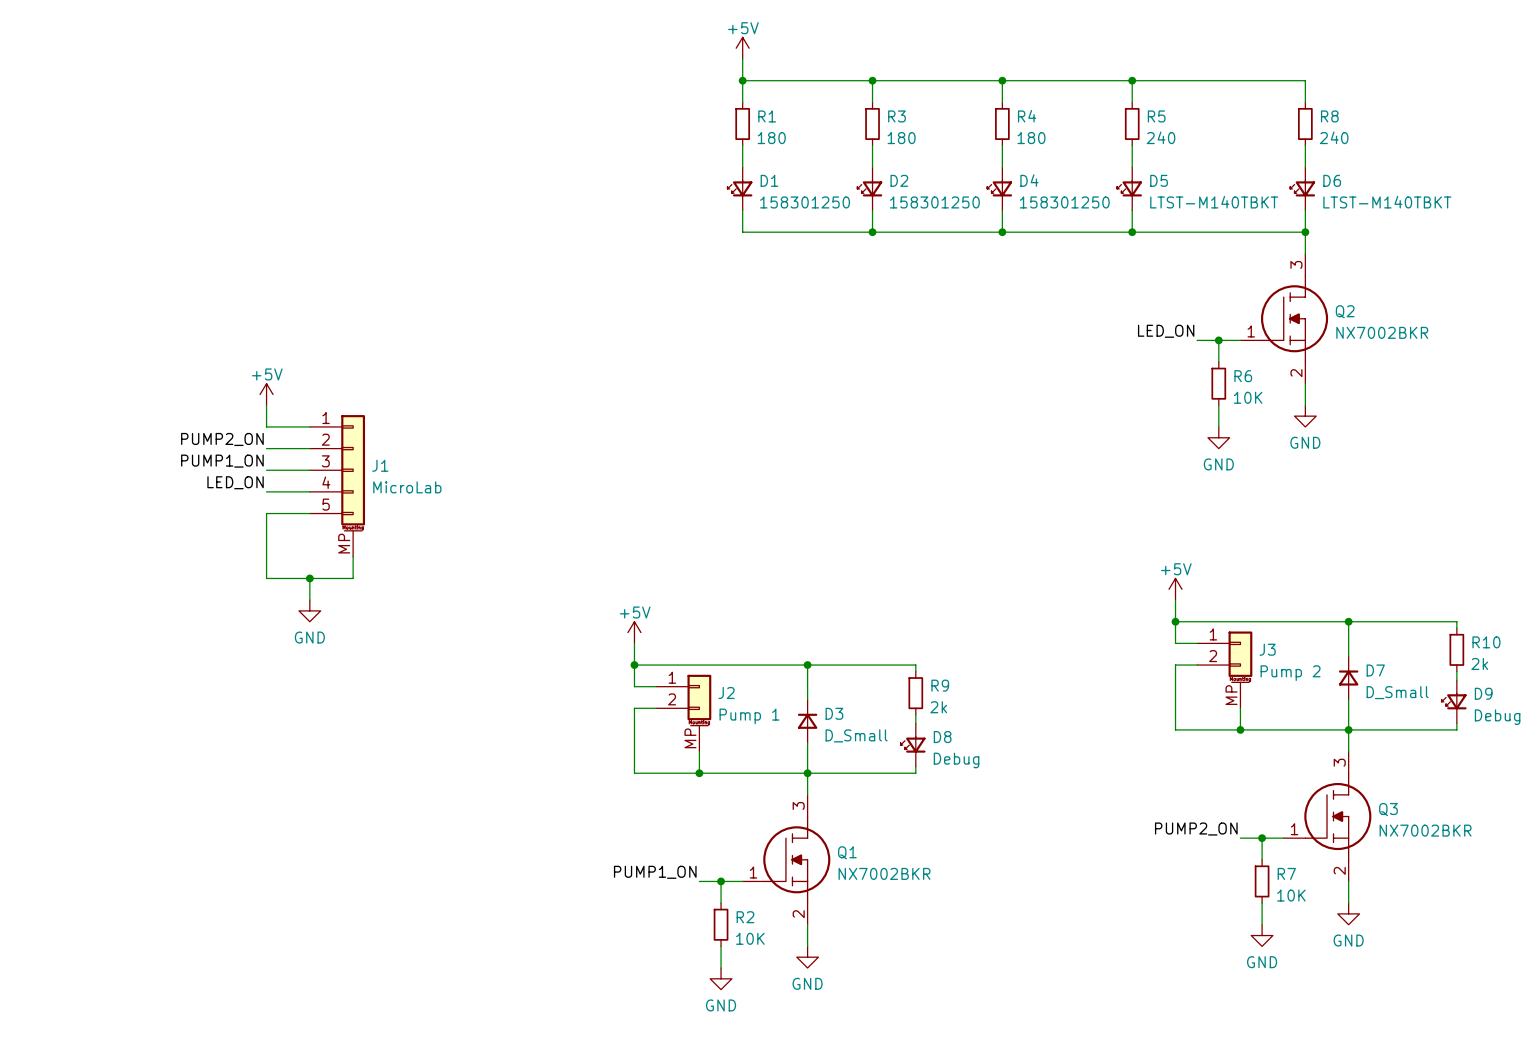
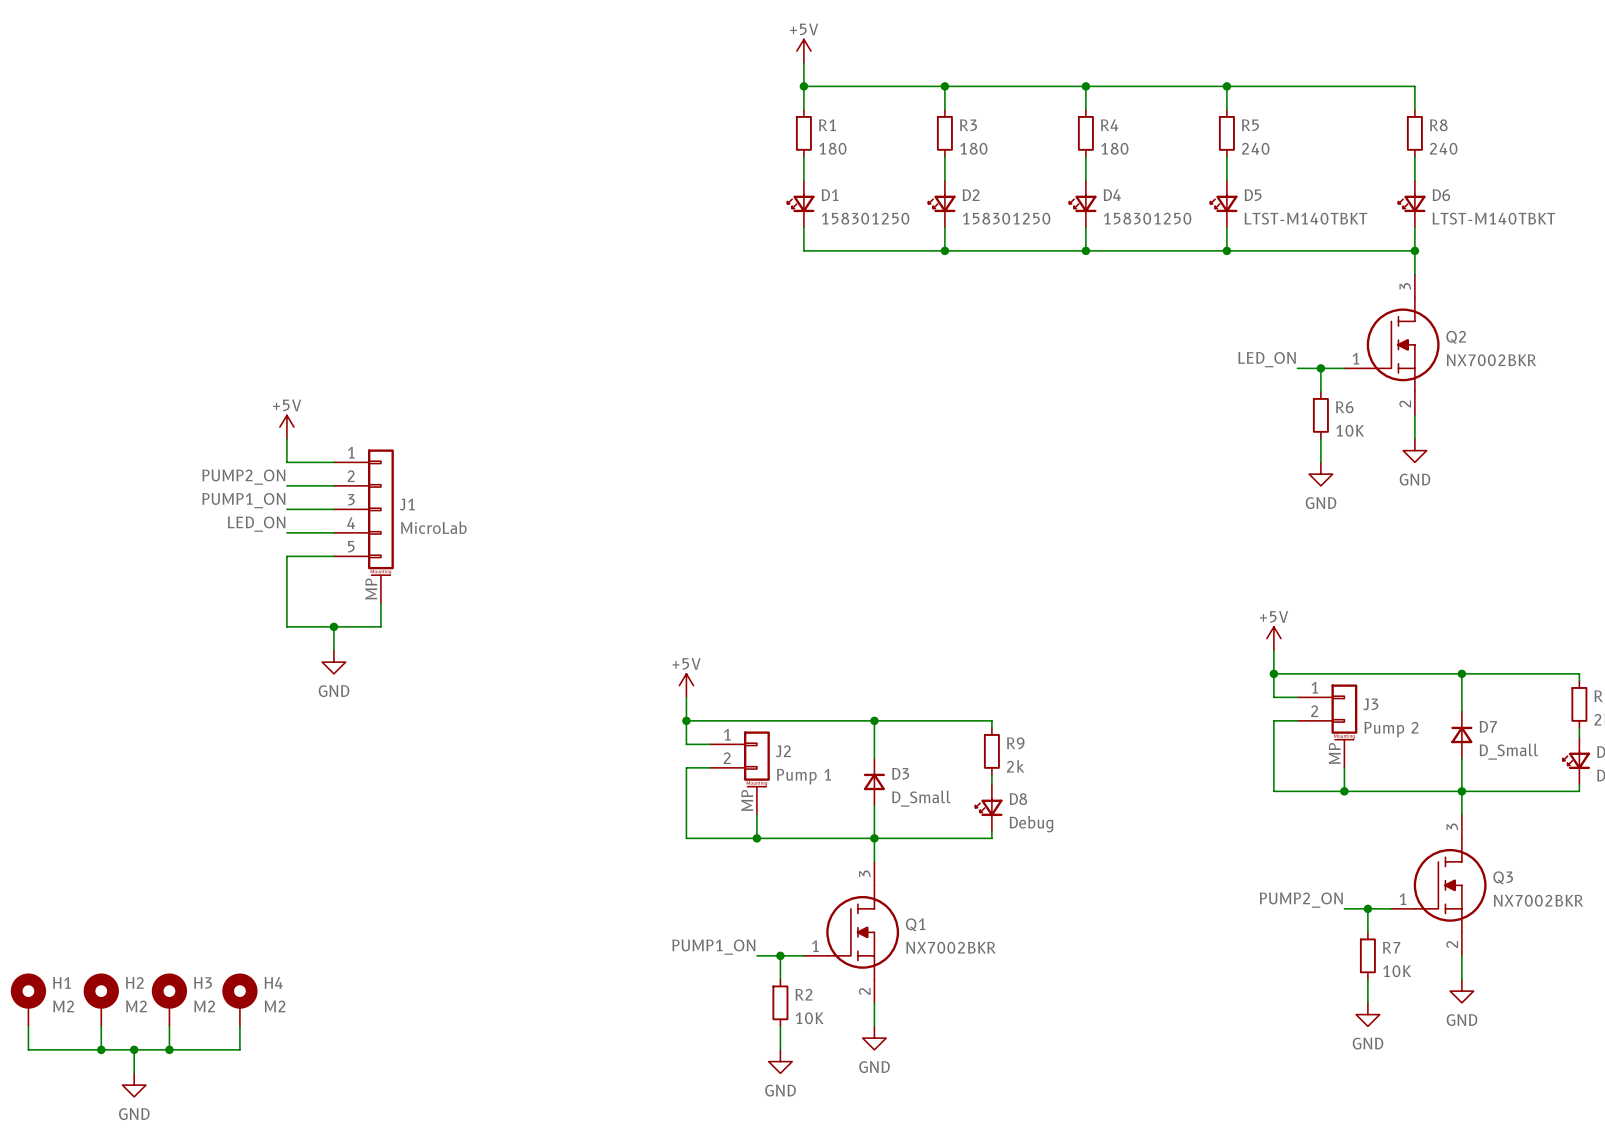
H1: none -> M2 (28, 999)
H2: none -> M2 (101, 999)
H3: none -> M2 (169, 999)
H4: none -> M2 (239, 999)
wire: none -> (28, 1026) (28, 1049) (239, 1049) (239, 1026)
wire: none -> (101, 1026) (101, 1049)
wire: none -> (169, 1026) (169, 1049)
junction: none -> (101, 1049)
wire: none -> (134, 1049) (134, 1073)
junction: none -> (134, 1049)
junction: none -> (169, 1049)
power symbol: none -> GND (134, 1085)

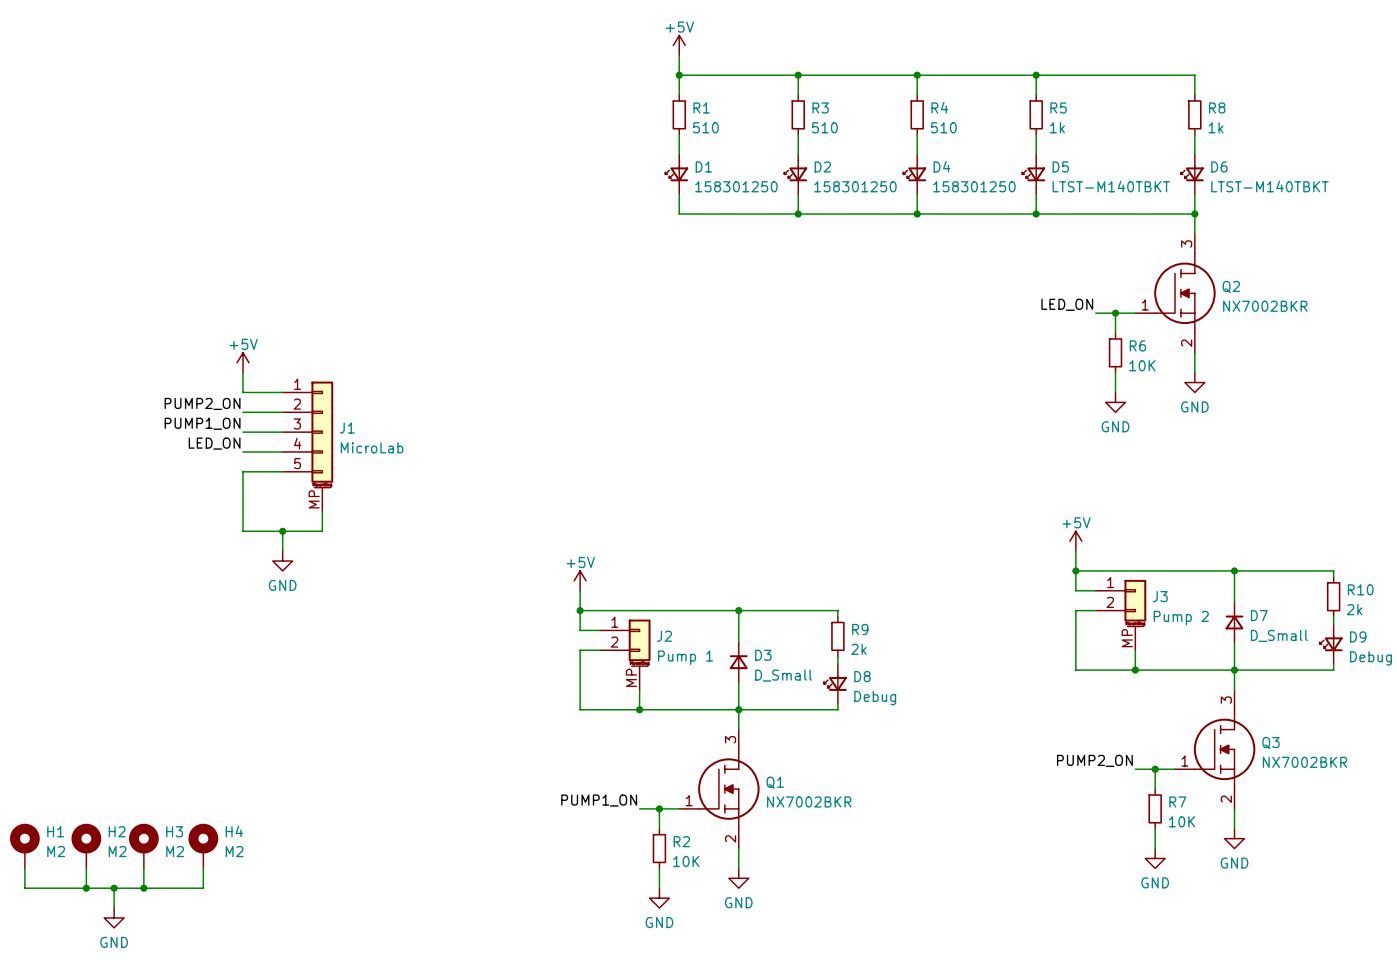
R1 value: 180 (832, 148) -> 510 (705, 127)
R3 value: 180 (973, 148) -> 510 (824, 127)
R4 value: 180 (1114, 148) -> 510 (943, 127)
R5 value: 240 (1255, 148) -> 1k (1057, 127)
R8 value: 240 (1443, 148) -> 1k (1216, 127)

